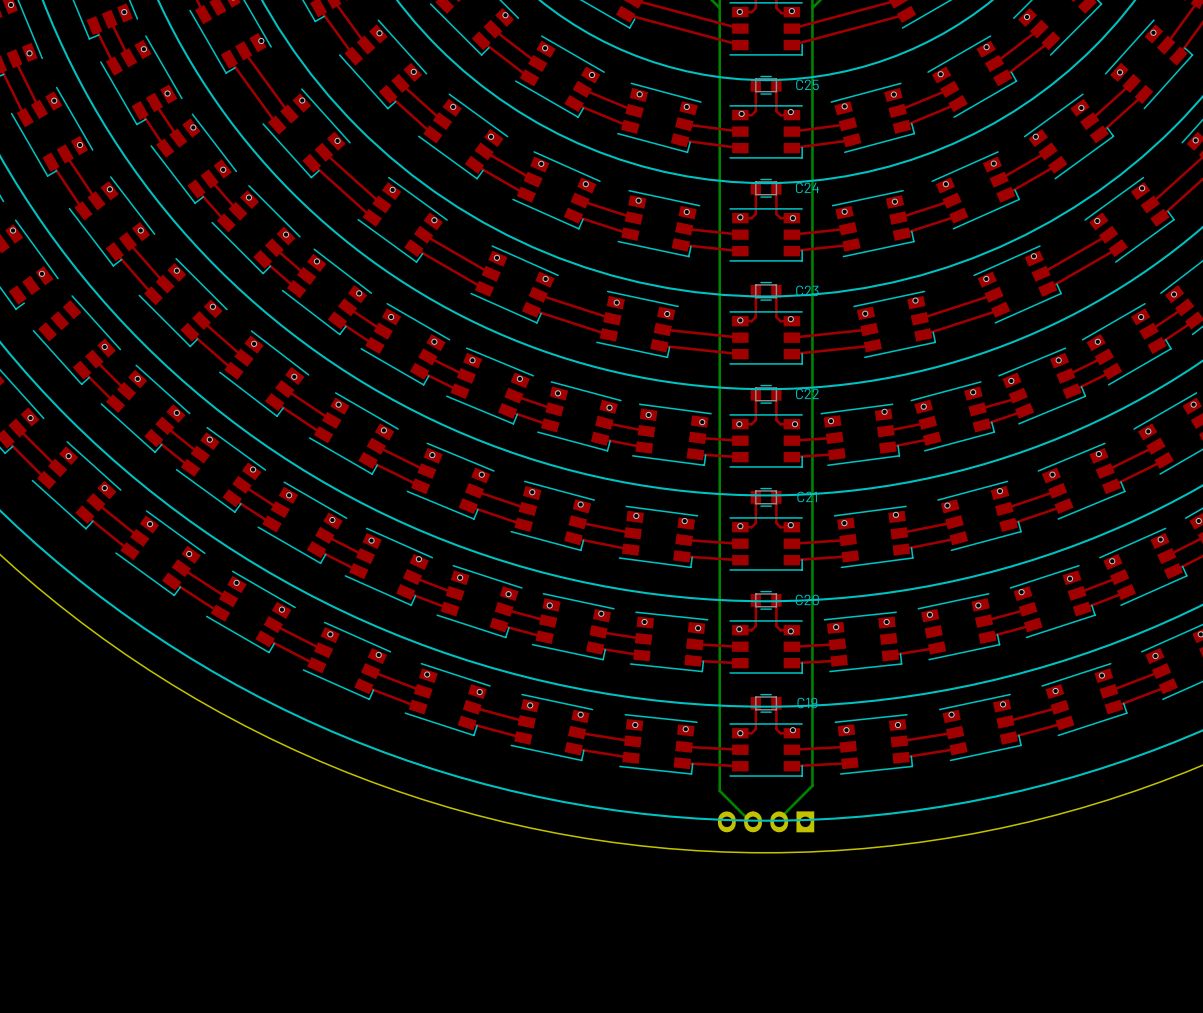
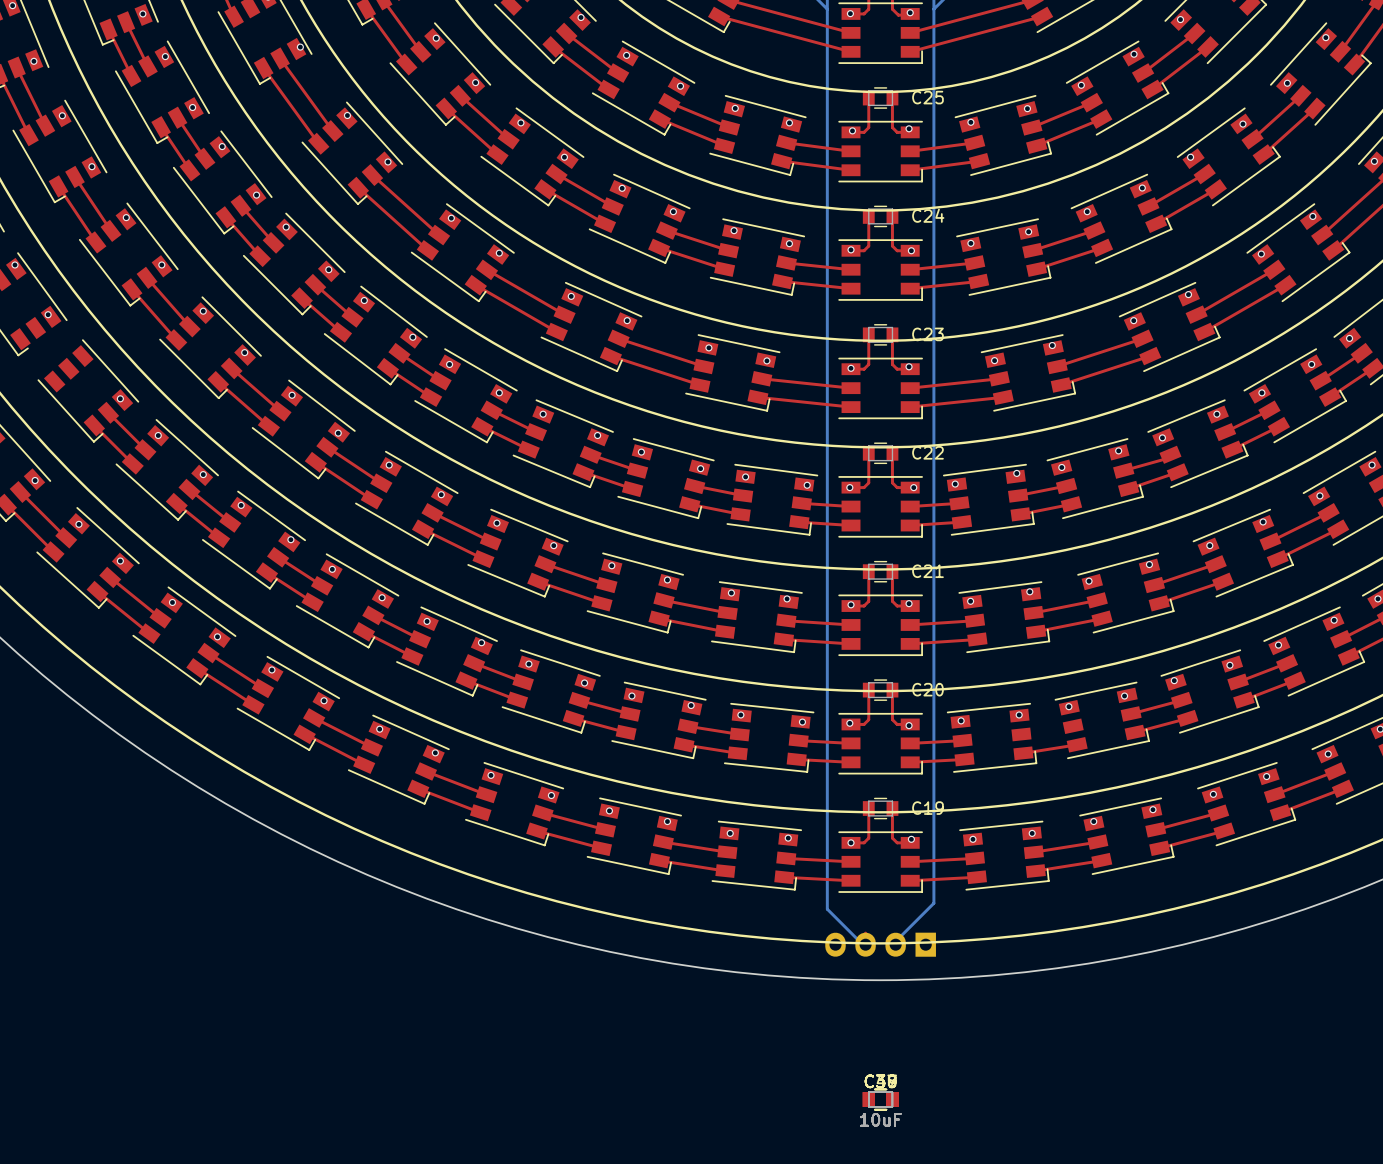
part: none -> 10uF (880, 1099)
part: none -> 10uF (880, 1099)
part: none -> 10uF (880, 1099)
part: none -> 10uF (880, 1099)

